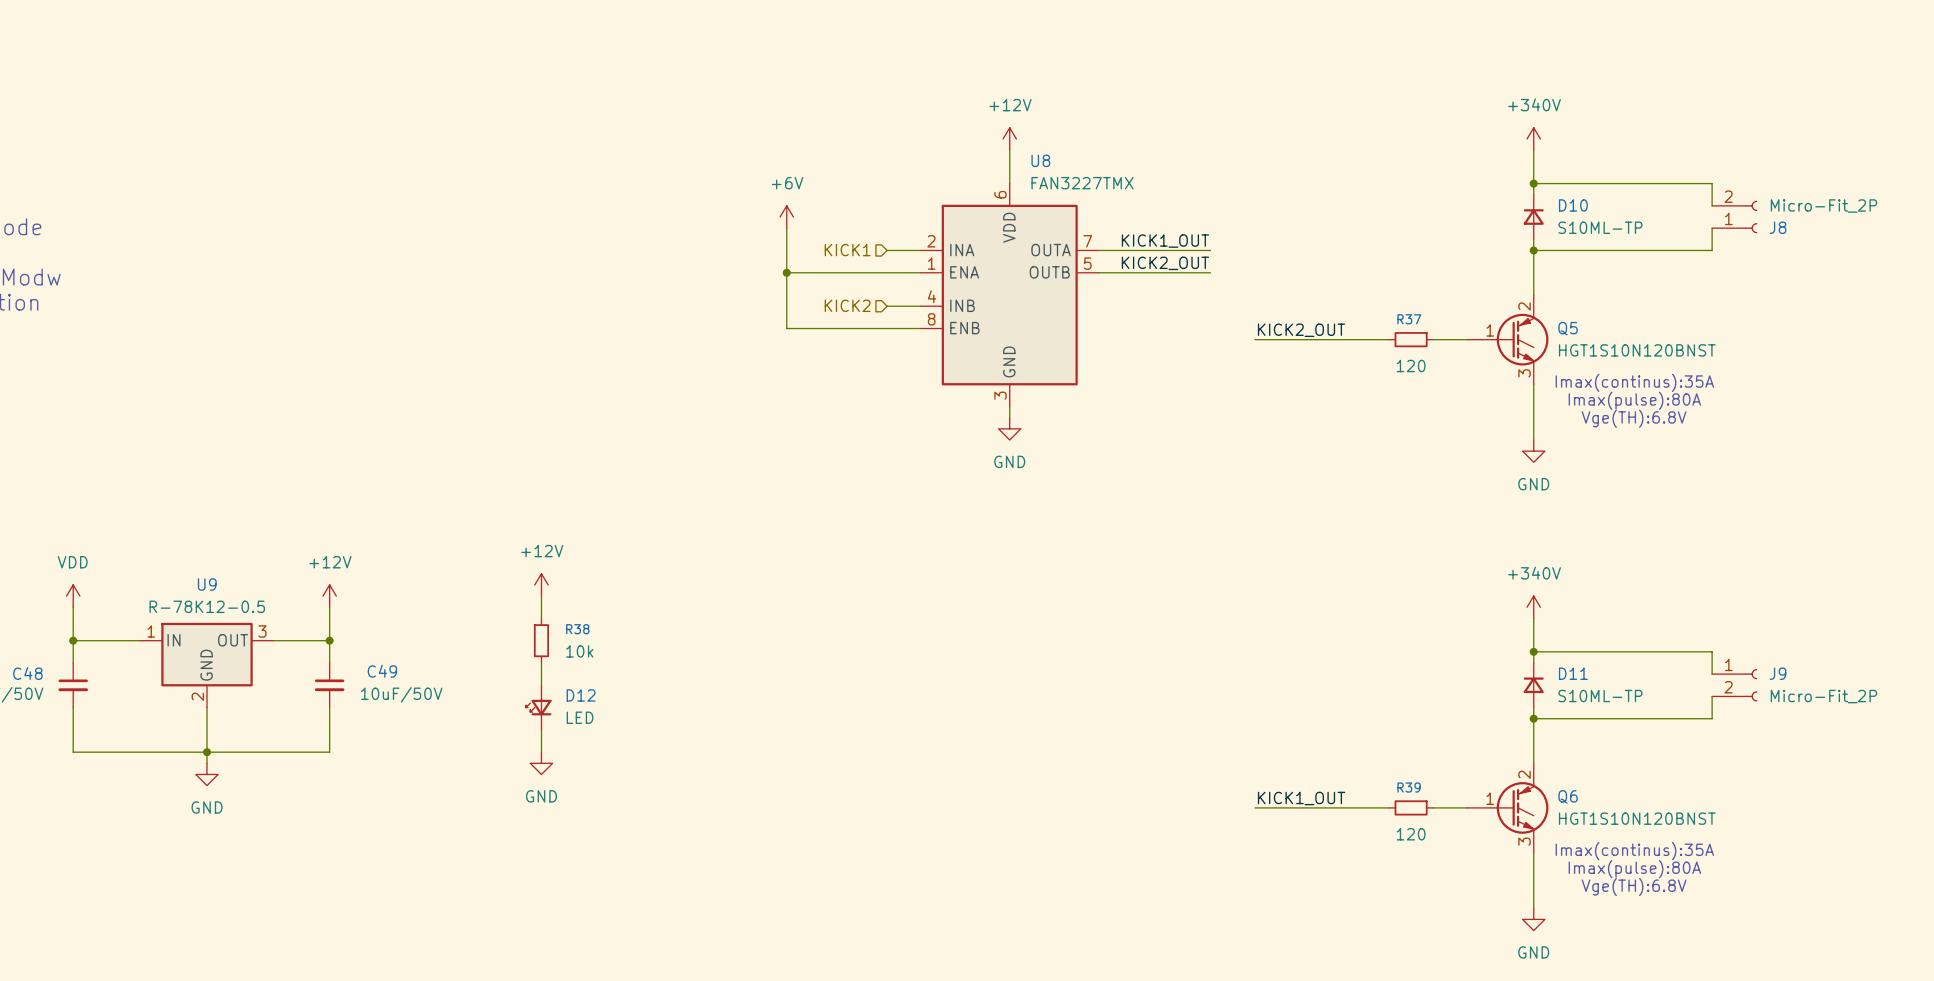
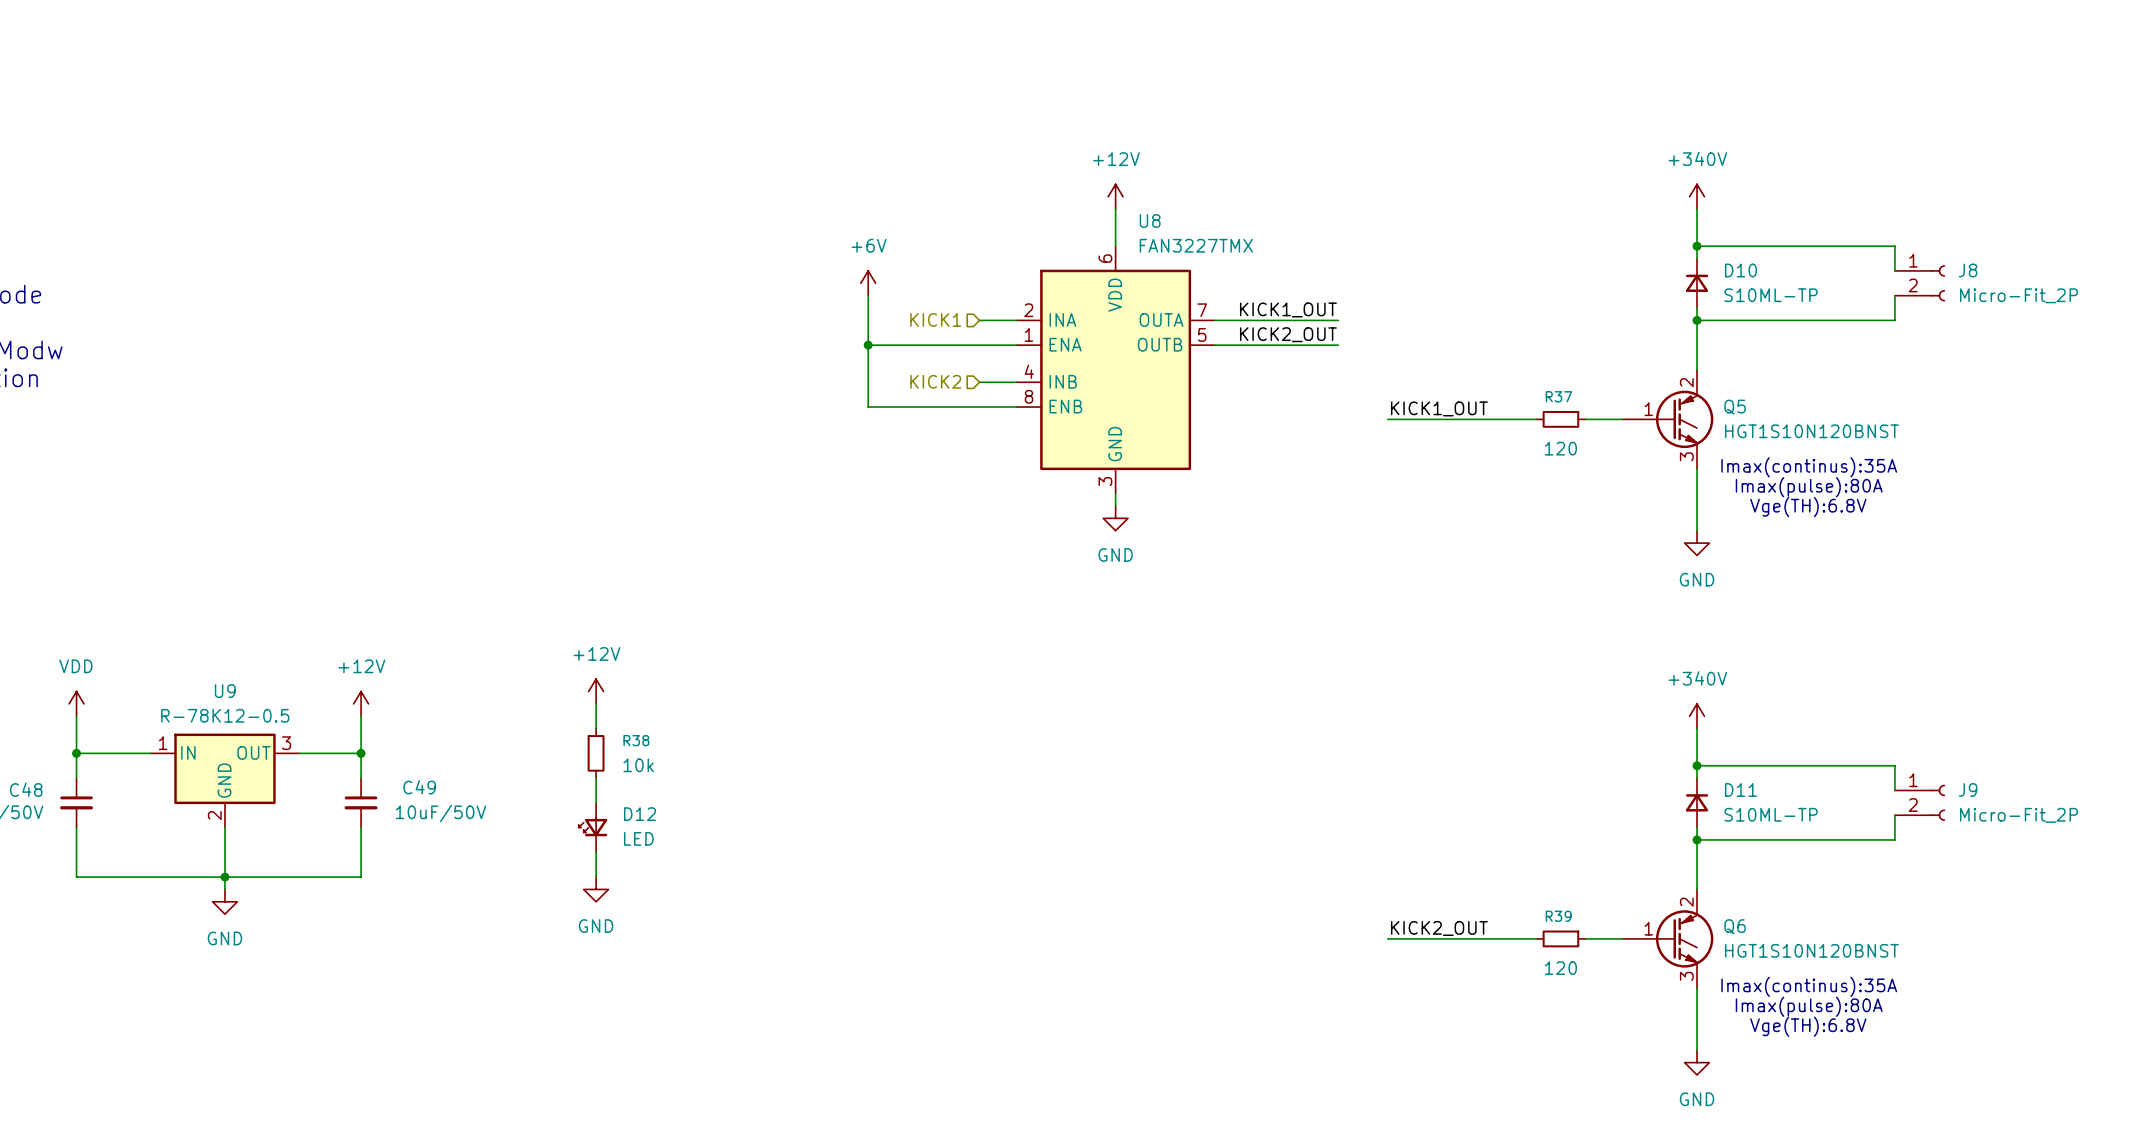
J8 flip: as is (1751, 217) -> up-down (1938, 283)
label: KICK2_OUT (1301, 330) -> KICK1_OUT (1439, 408)
label: KICK1_OUT (1301, 798) -> KICK2_OUT (1439, 928)

